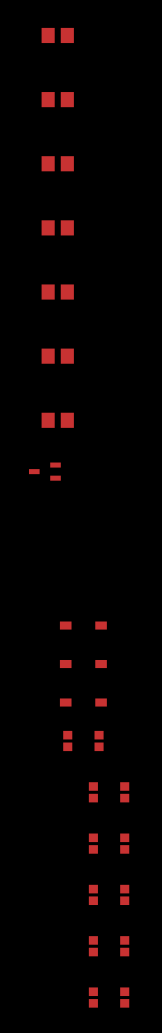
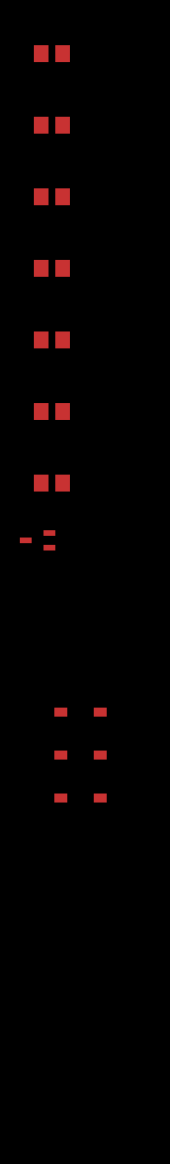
part: (83, 740) -> none
part: (109, 792) -> none
part: (109, 843) -> none
part: (109, 894) -> none
part: (109, 946) -> none
part: (109, 997) -> none

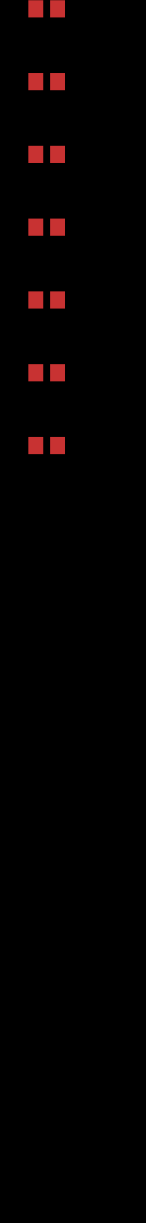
part: (51, 483) -> none
part: (37, 540) -> none
part: (80, 712) -> none
part: (80, 755) -> none
part: (80, 798) -> none

